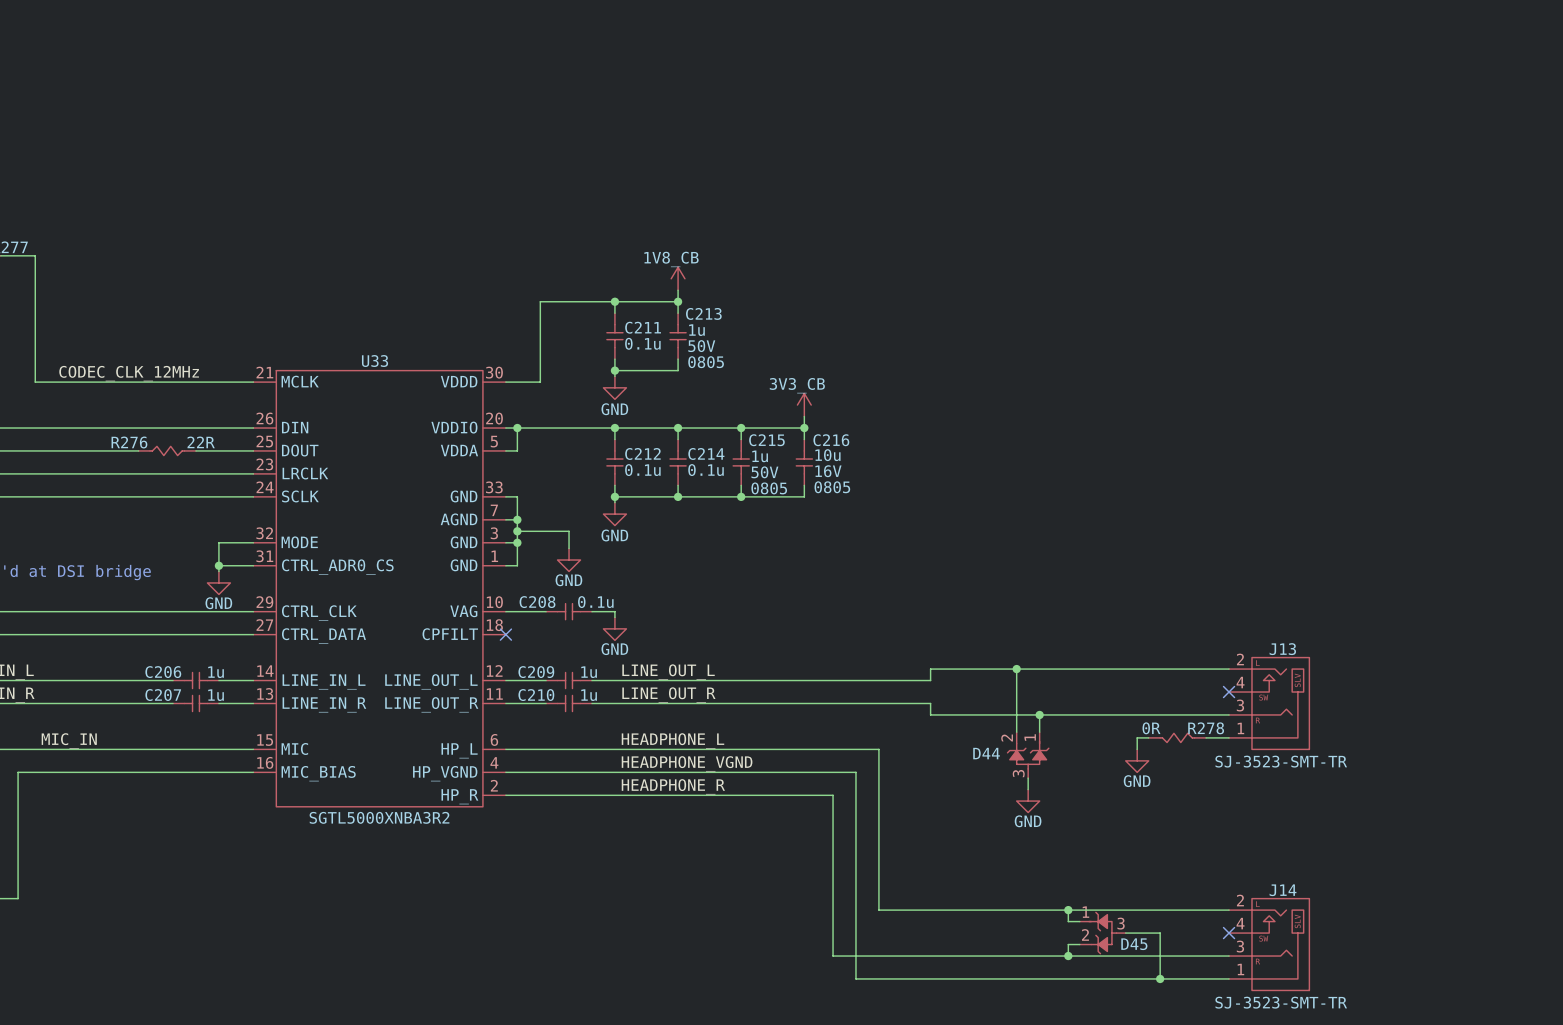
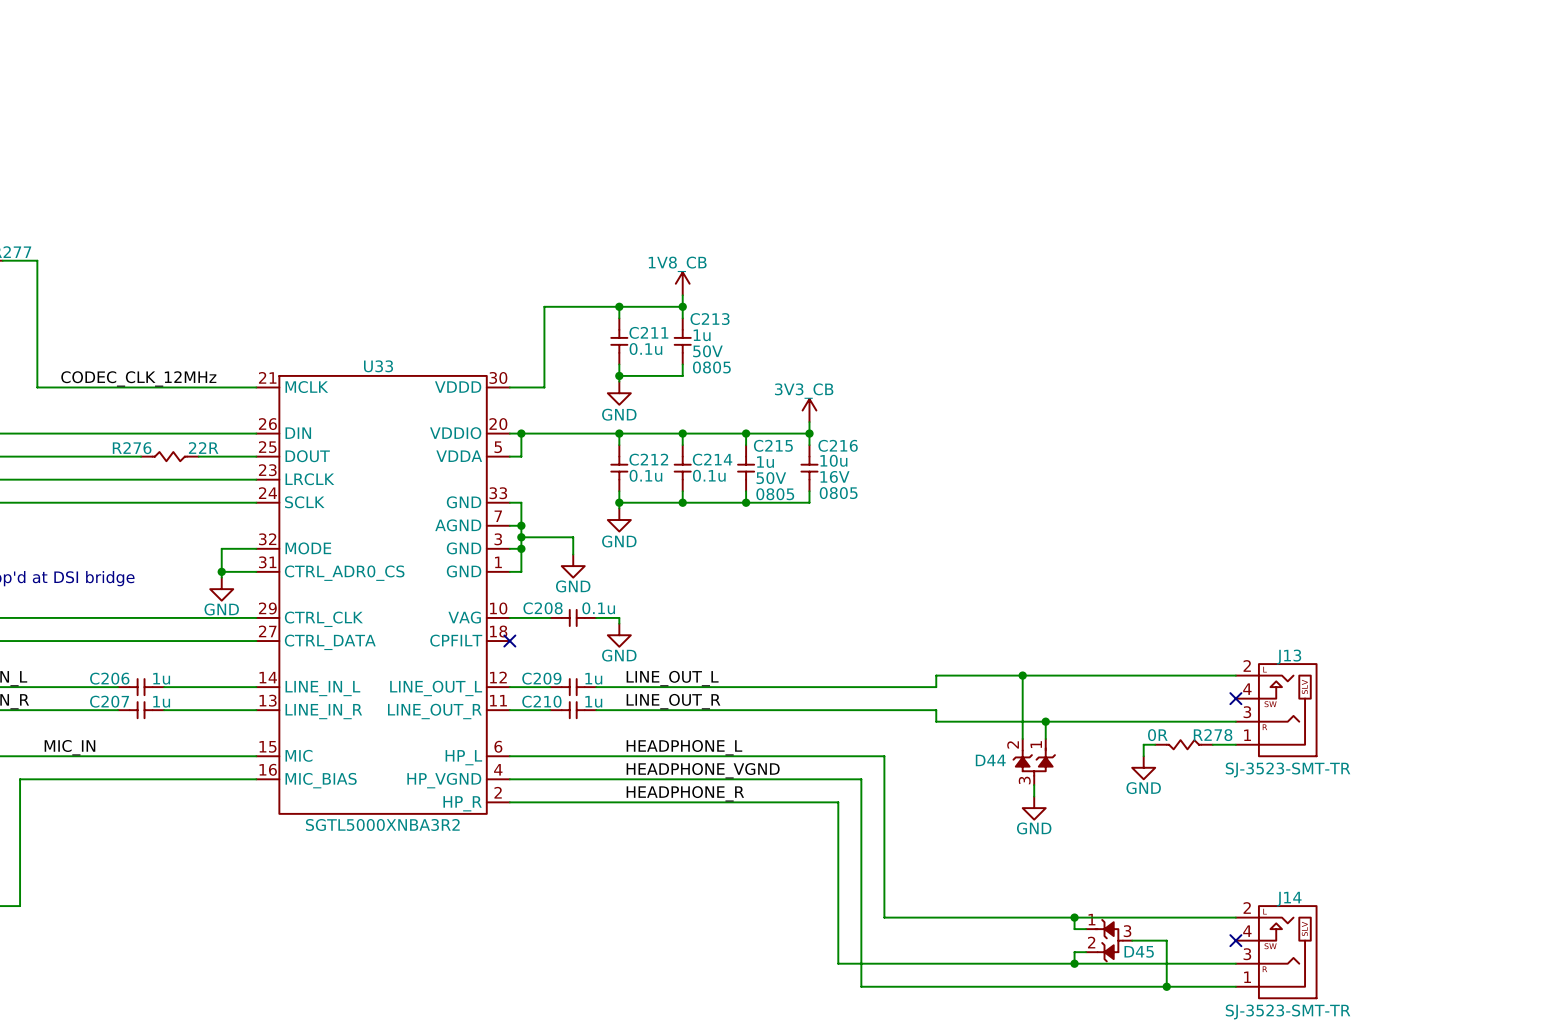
C206 position: (195, 680) -> (141, 687)
C207 position: (195, 703) -> (141, 710)

